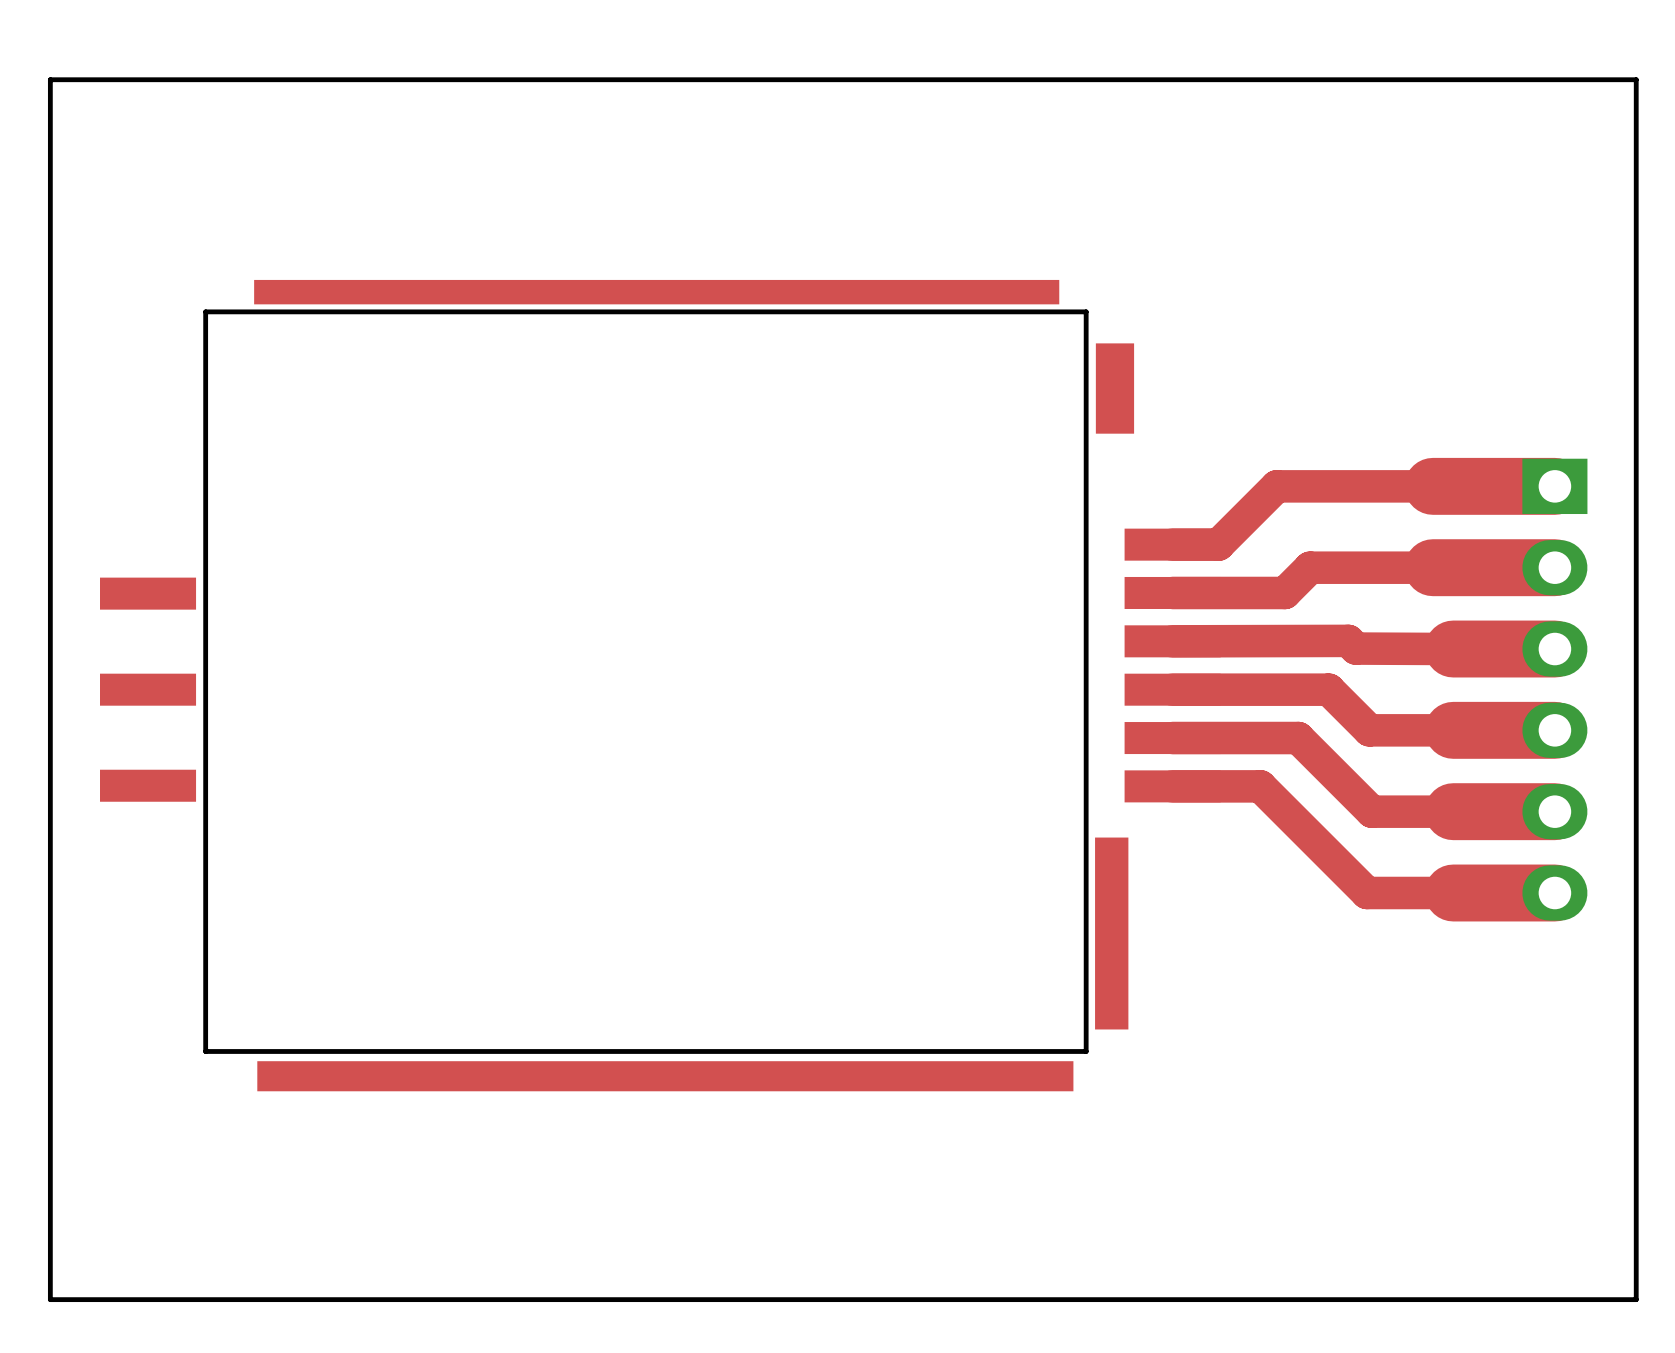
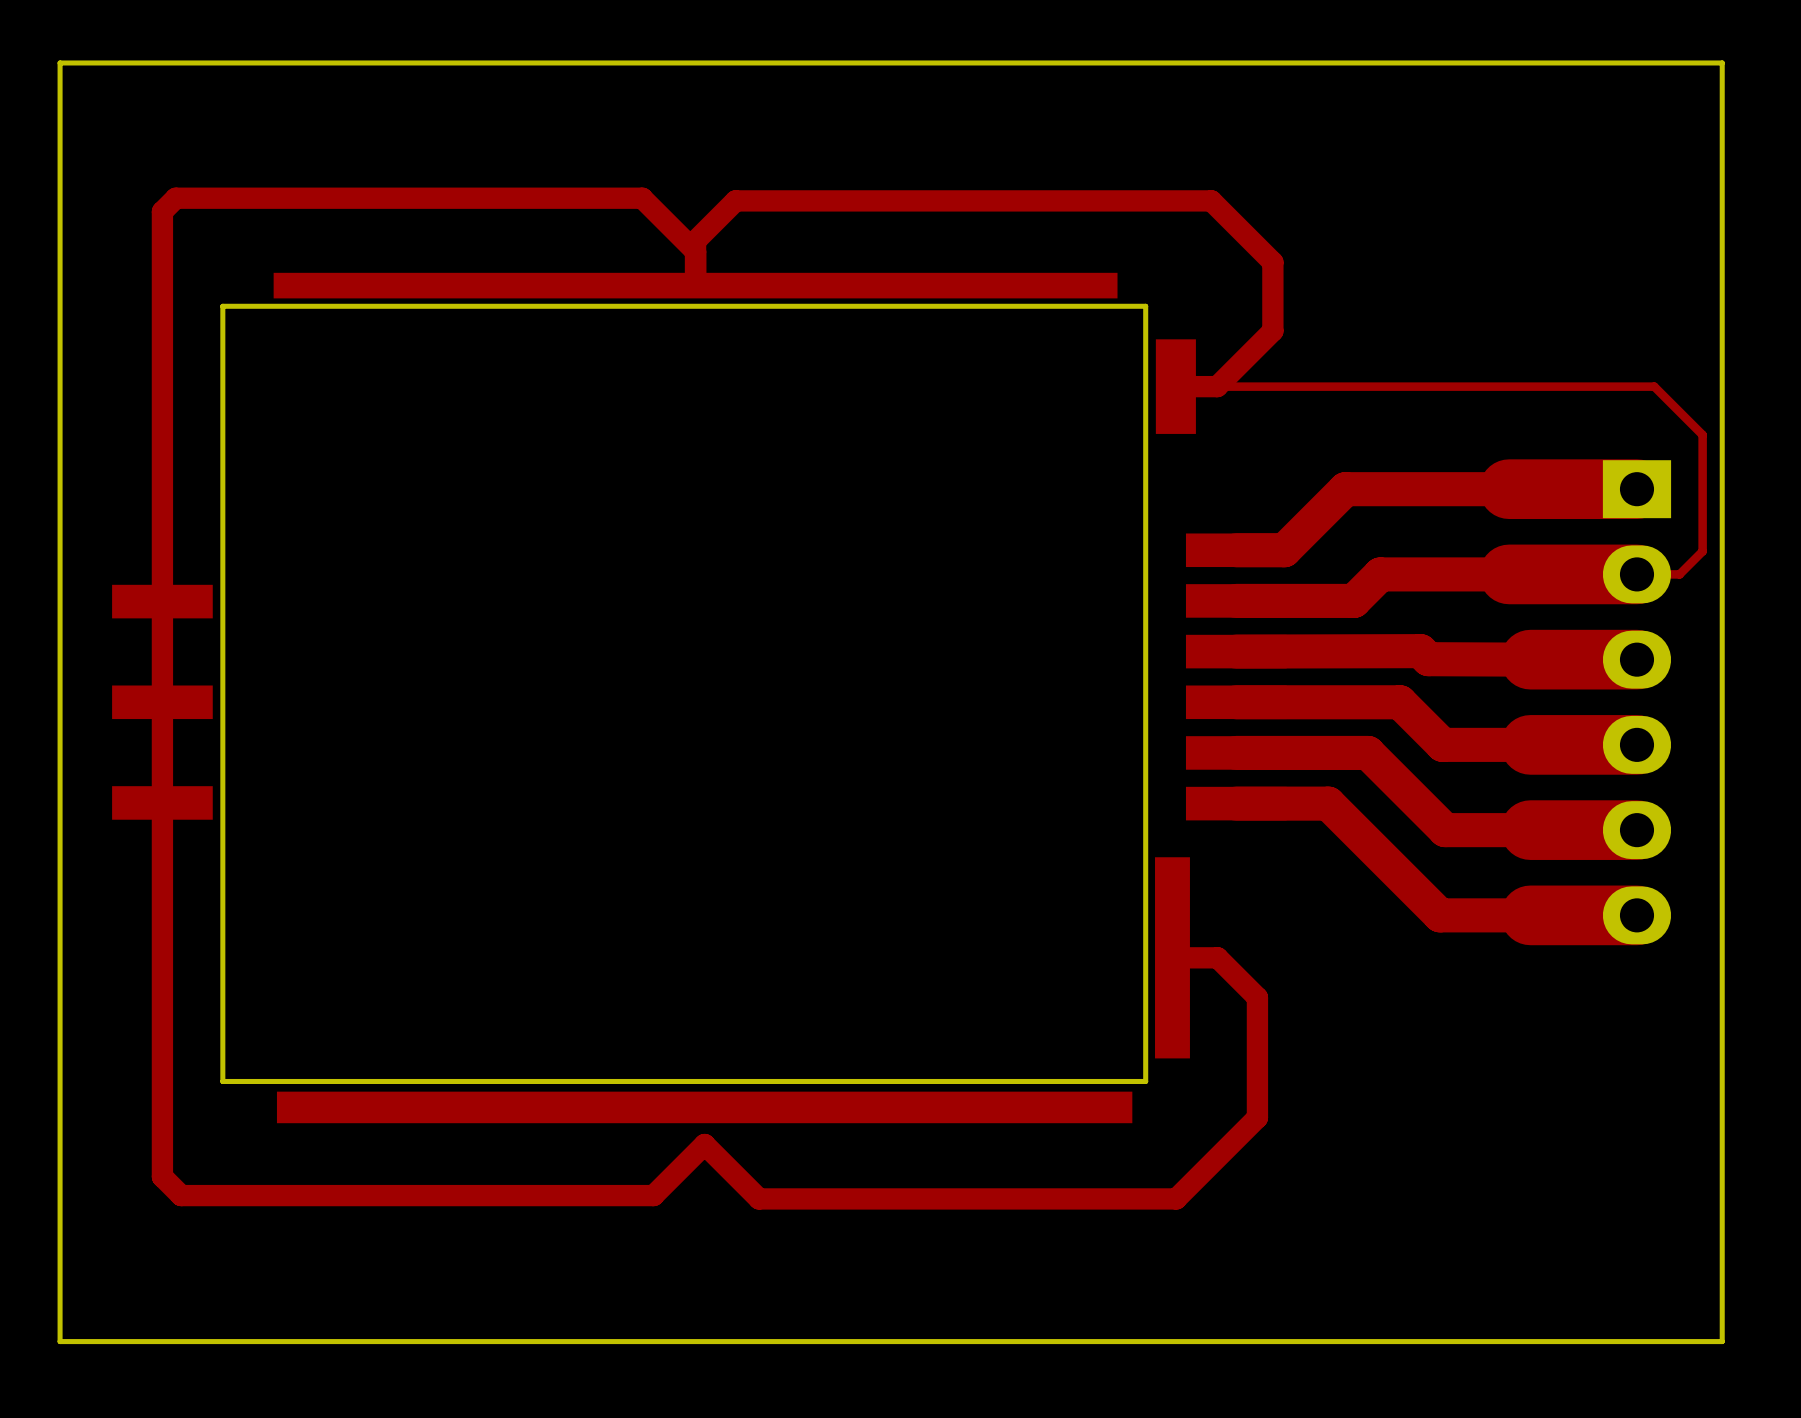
top track: none -> (695, 251) (642, 198) (175, 198) (162, 211) (162, 1176) (181, 1195) (653, 1195) (704, 1144) (759, 1198) (1176, 1198) (1257, 1117) (1257, 997) (1217, 957) (1172, 957)
top track: none -> (695, 285) (695, 240) (735, 200) (1211, 200) (1272, 262) (1272, 330) (1217, 386) (1175, 386) (1654, 386) (1702, 434) (1702, 551) (1679, 574) (1636, 574)

